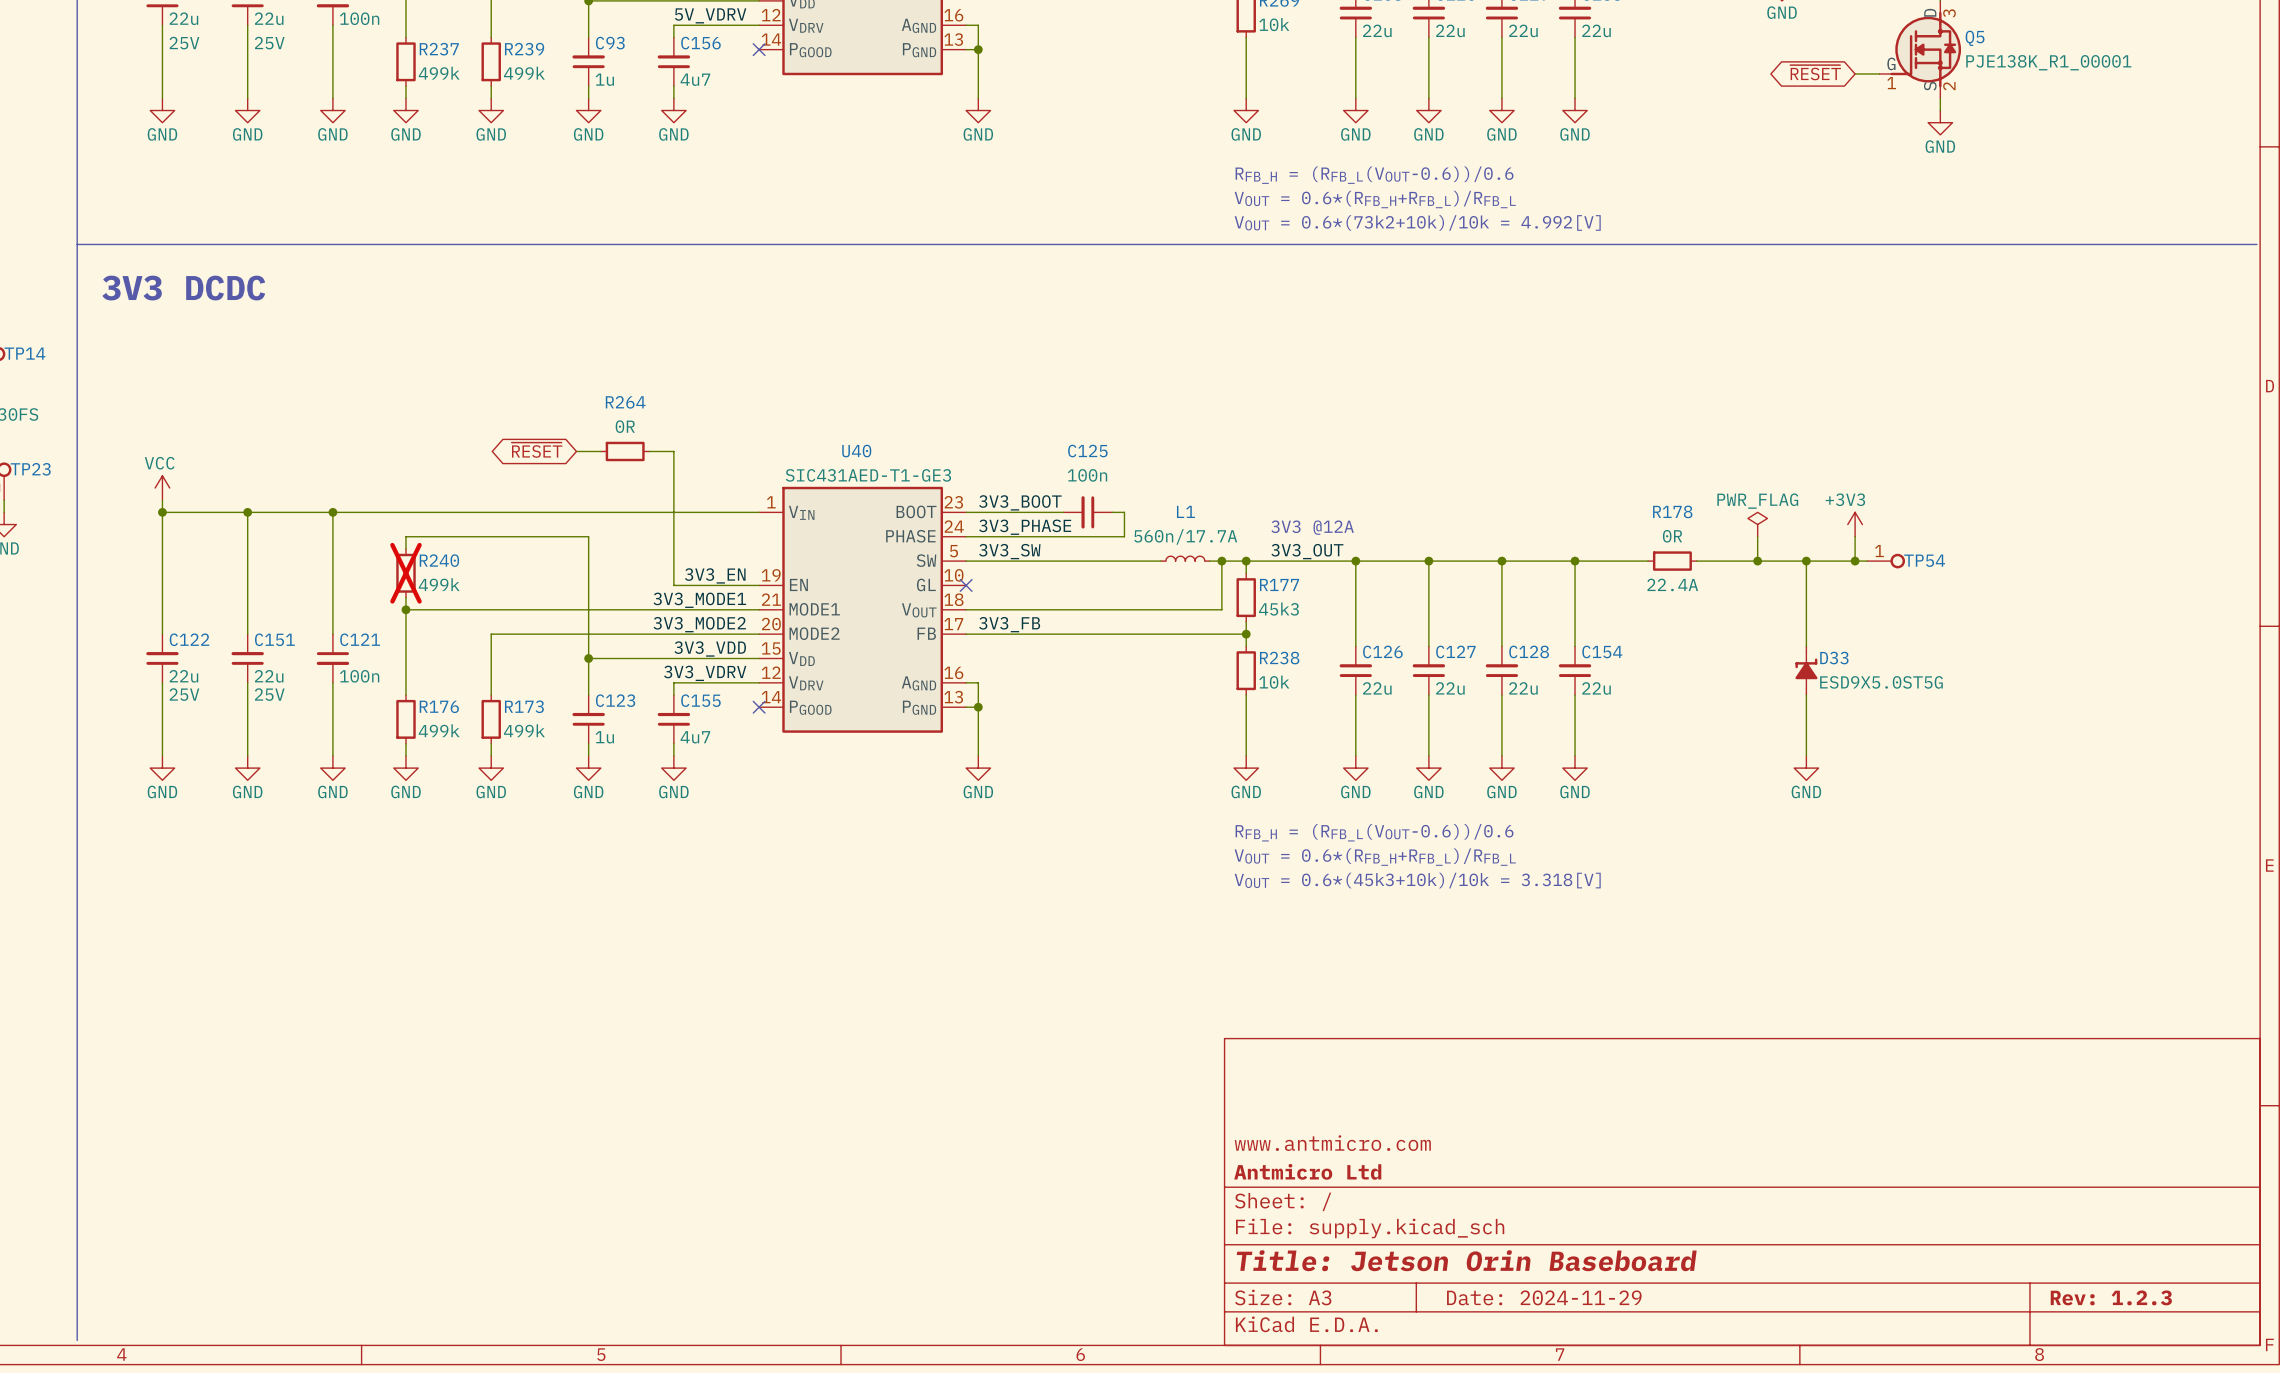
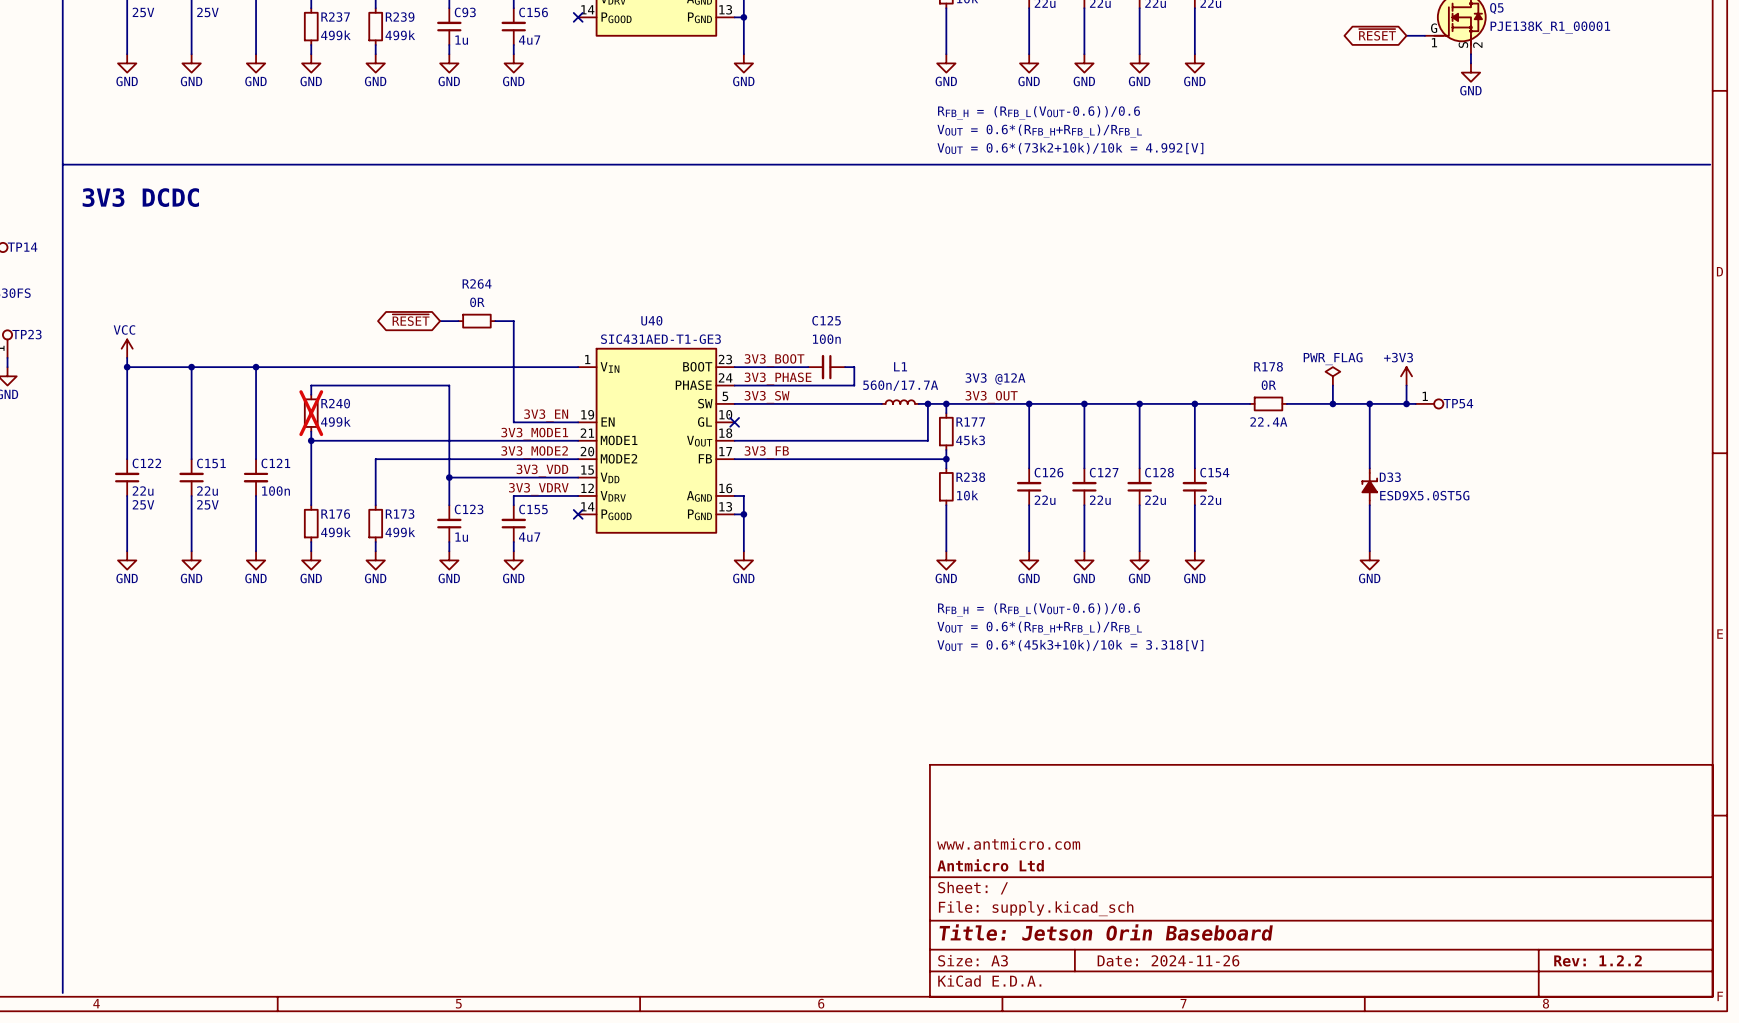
title block: Date: 2024-11-29 (1544, 1297) -> Date: 2024-11-26 (1168, 960)
title block: Rev: 1.2.3 (2111, 1297) -> Rev: 1.2.2 (1597, 960)

